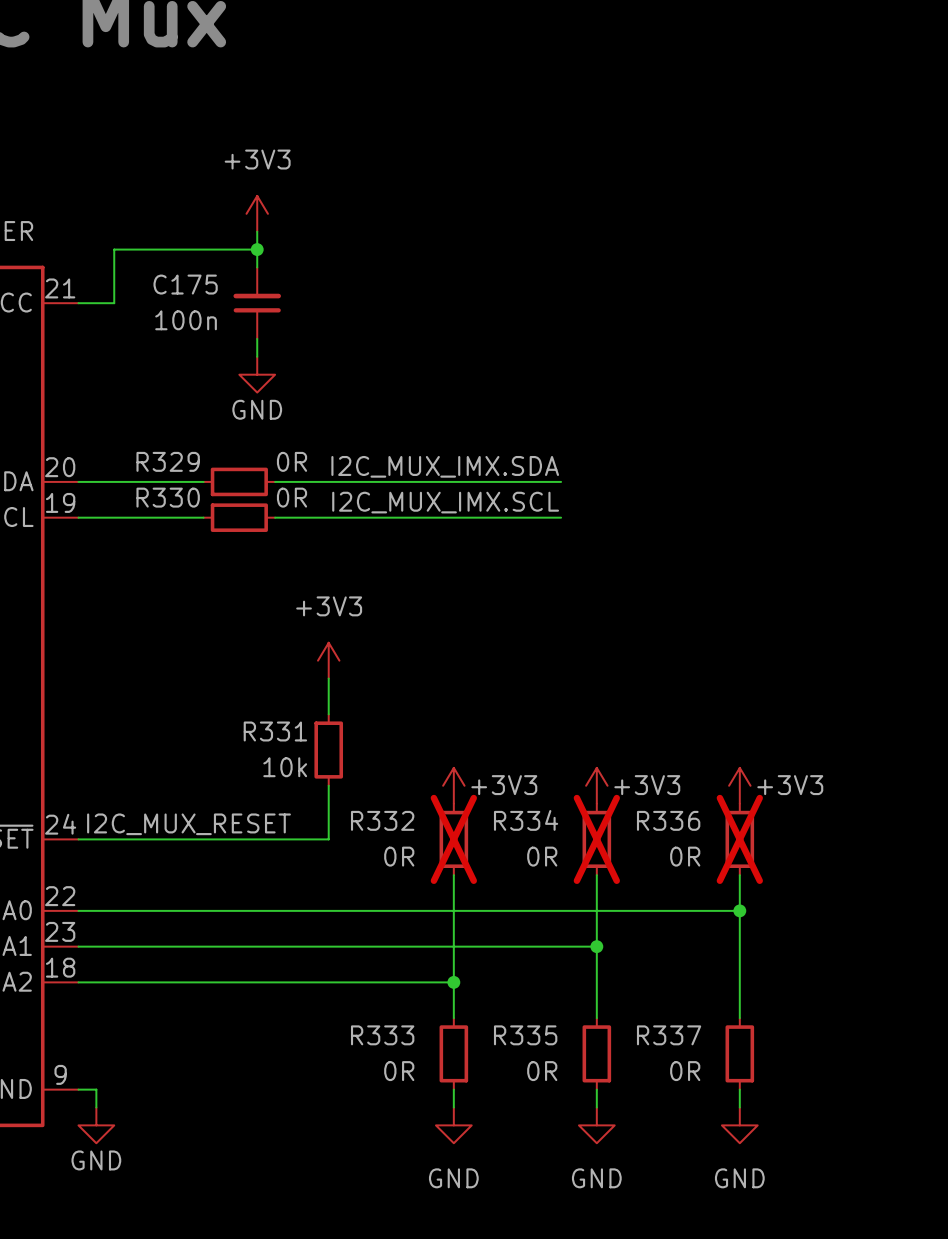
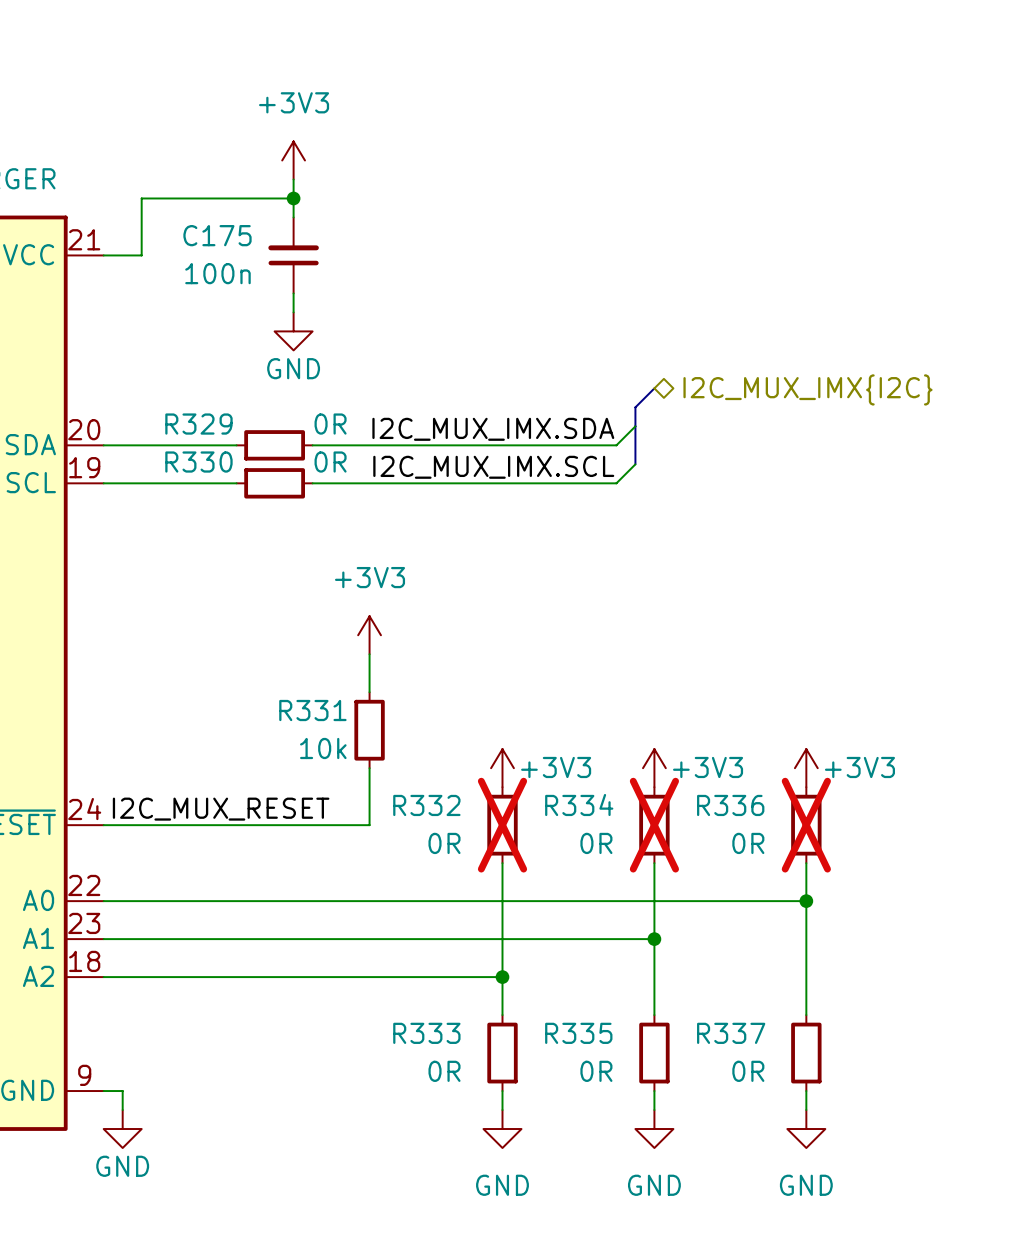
bus: none -> (654, 388) (635, 407) (635, 464)
hierarchical label: none -> I2C_MUX_IMX{I2C} (807, 389)
wire: none -> (635, 426) (616, 445)
wire: none -> (635, 464) (616, 483)

